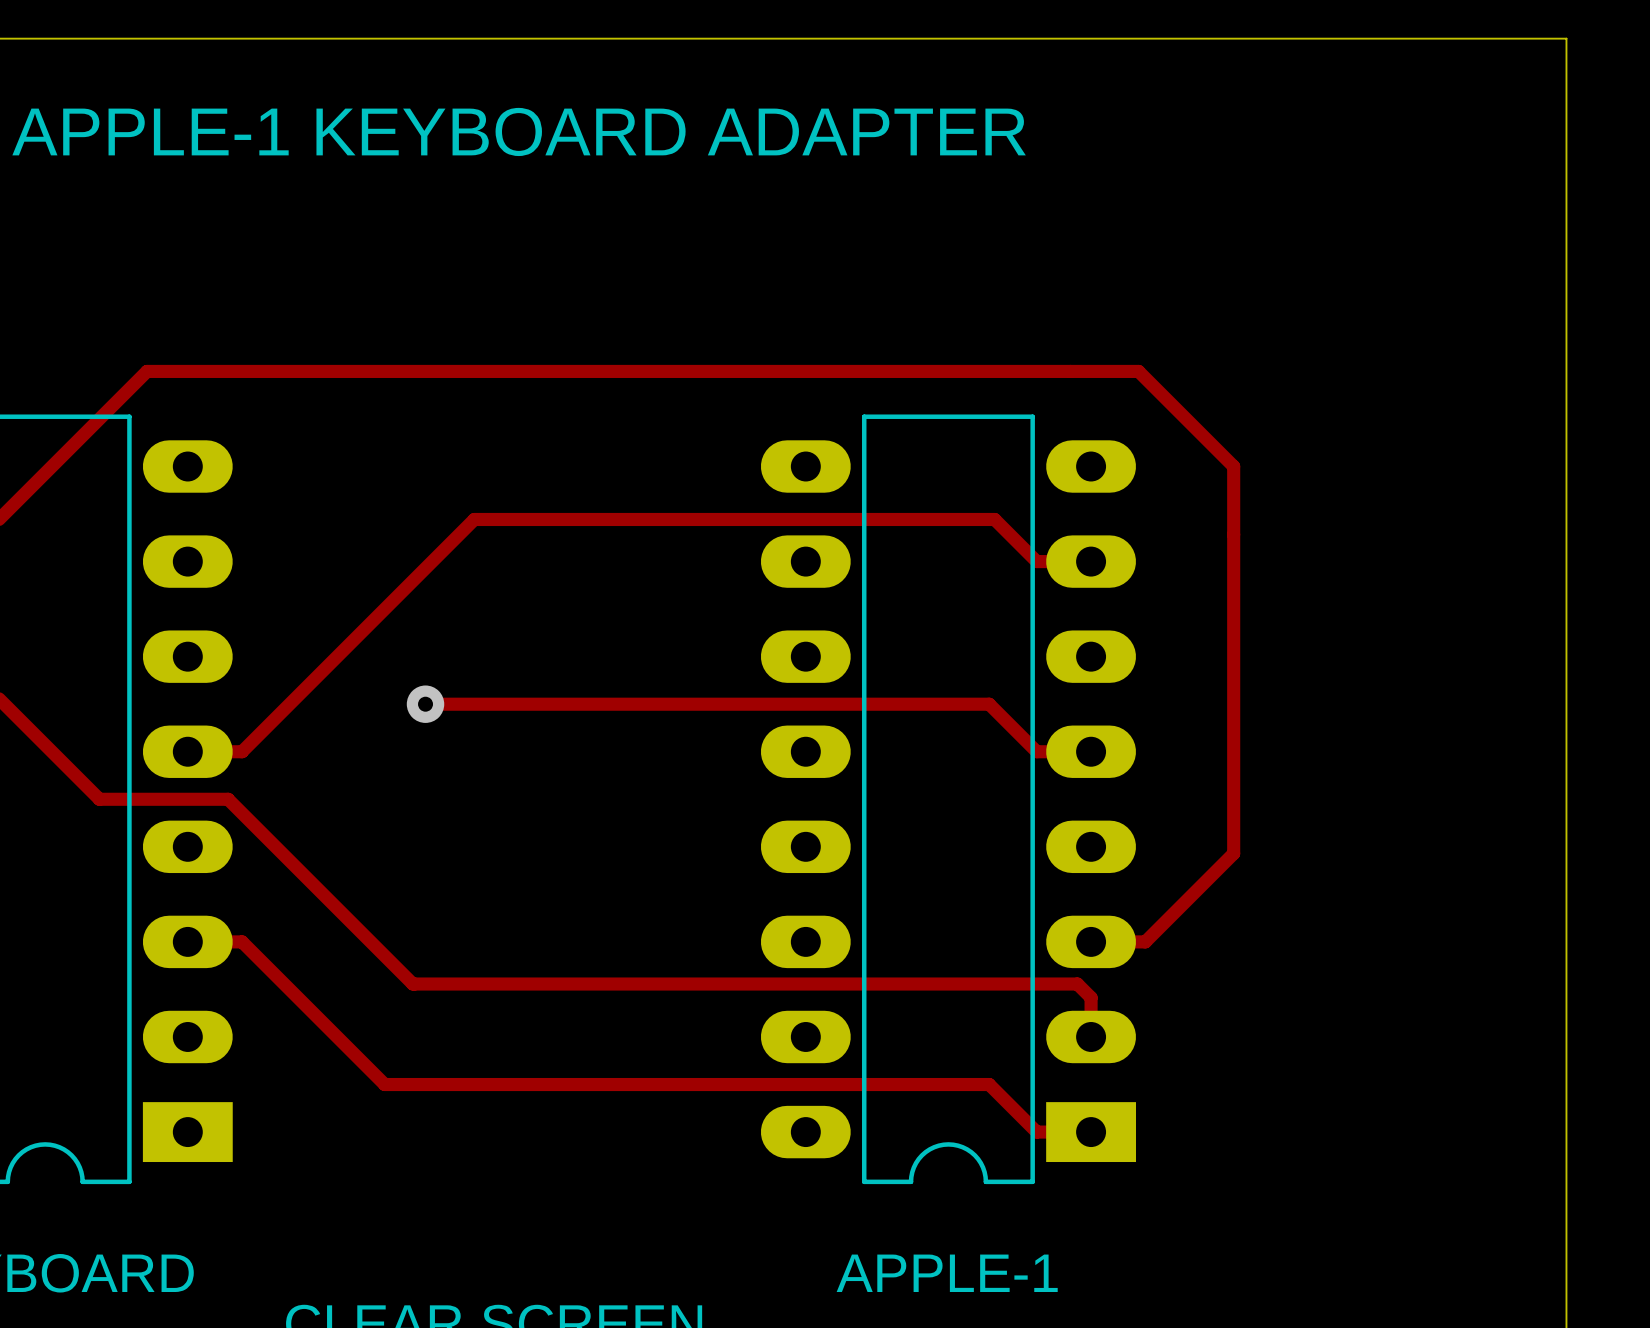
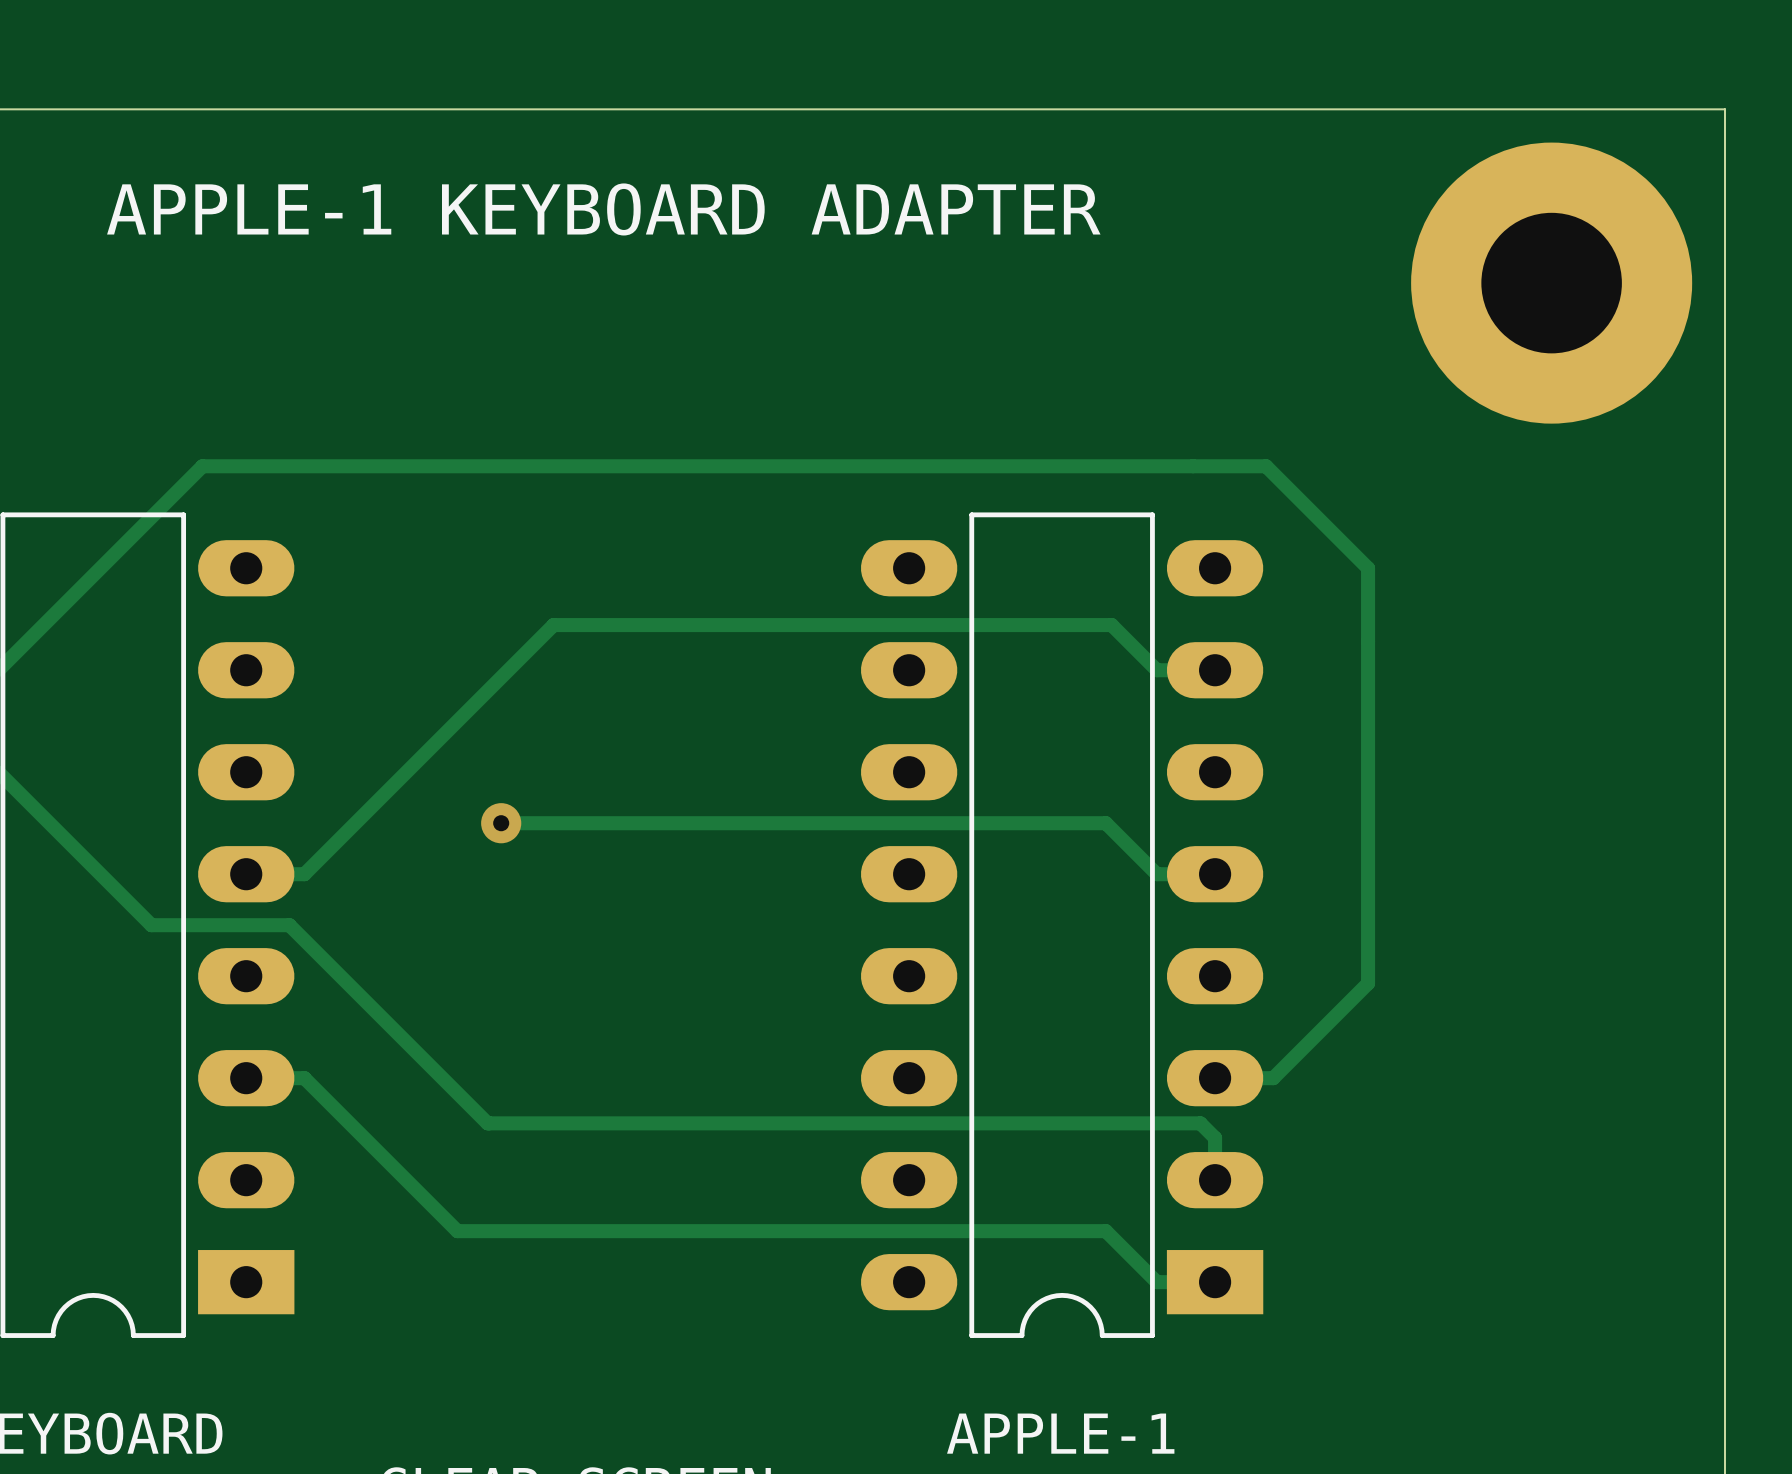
part: none -> (1551, 283)

